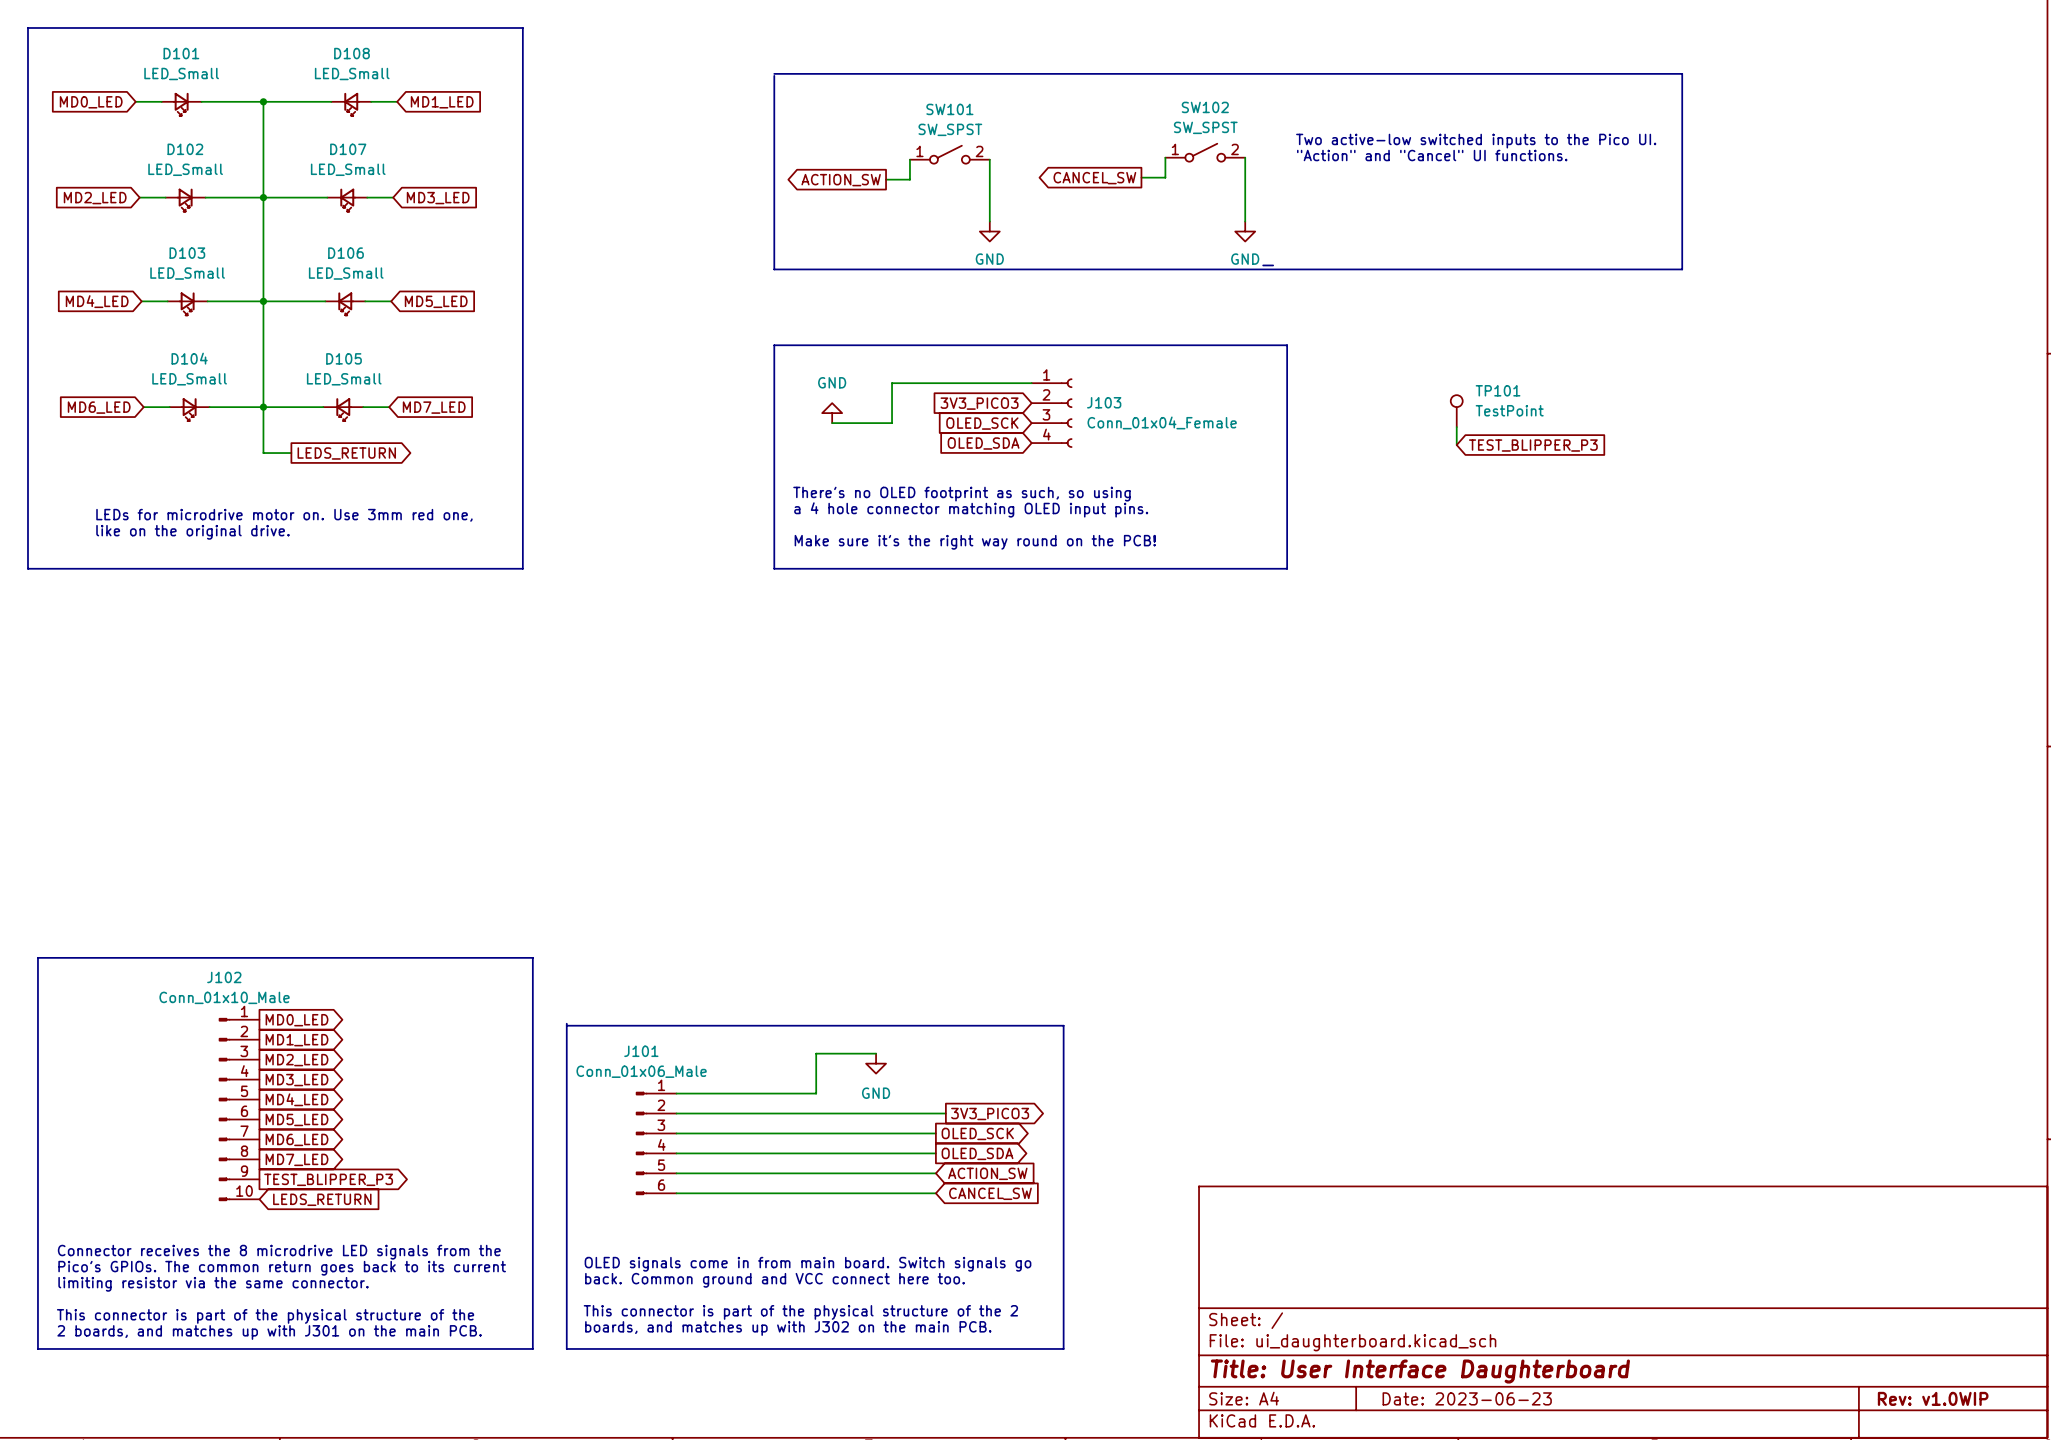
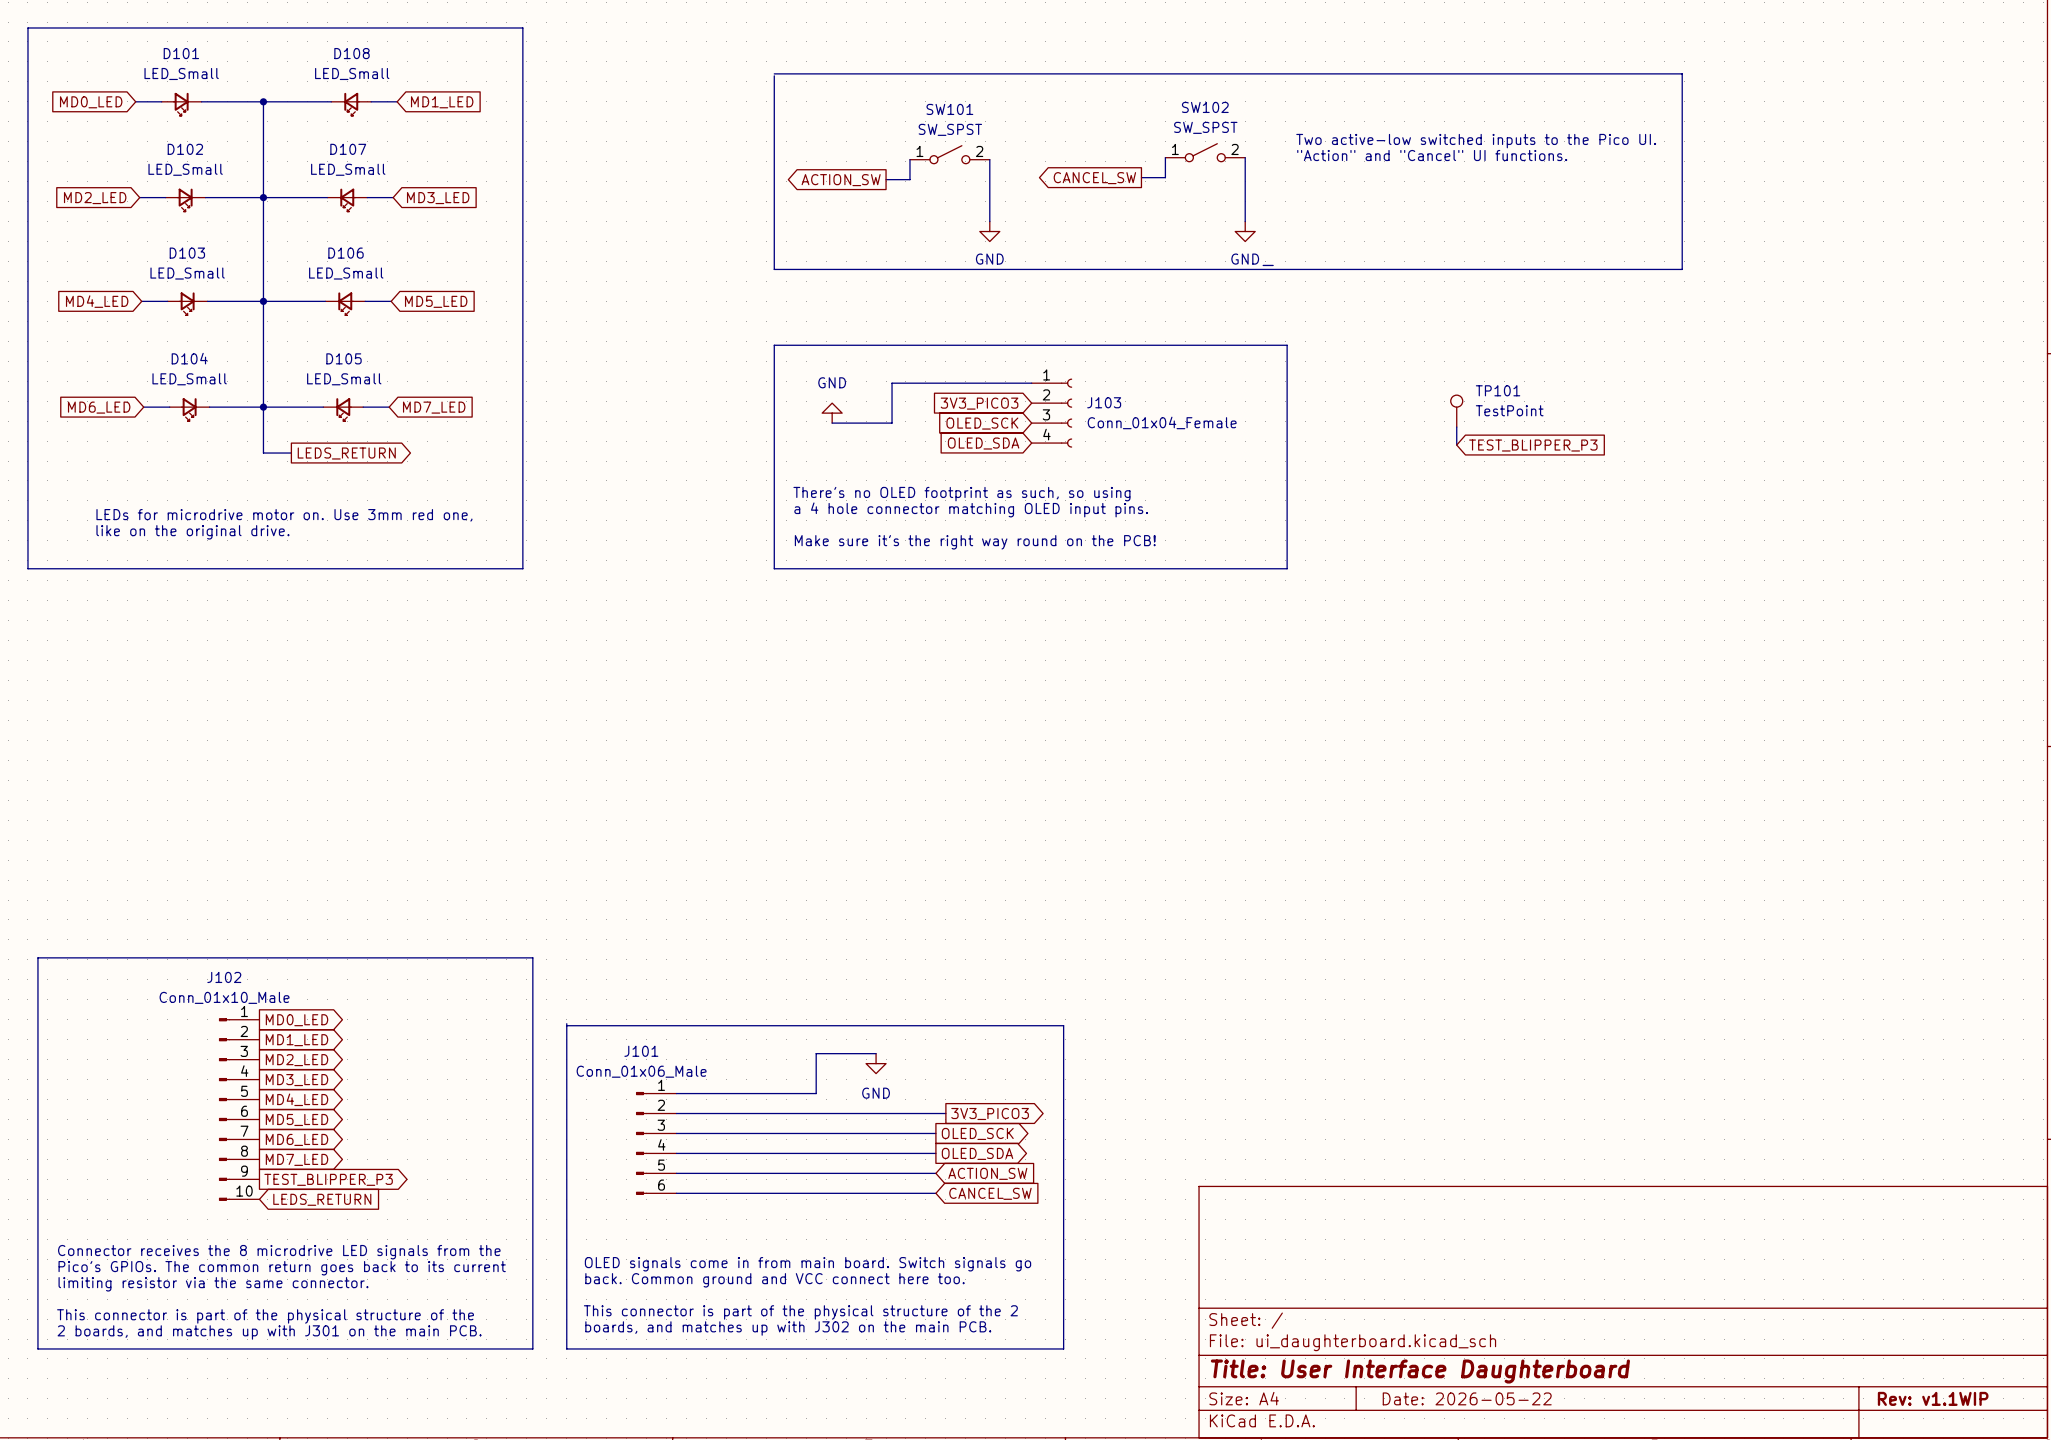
title block: Date: 2023-06-23 (1467, 1398) -> Date: 2026-05-22 (1467, 1398)
title block: Rev: v1.0WIP (1933, 1398) -> Rev: v1.1WIP (1933, 1398)

